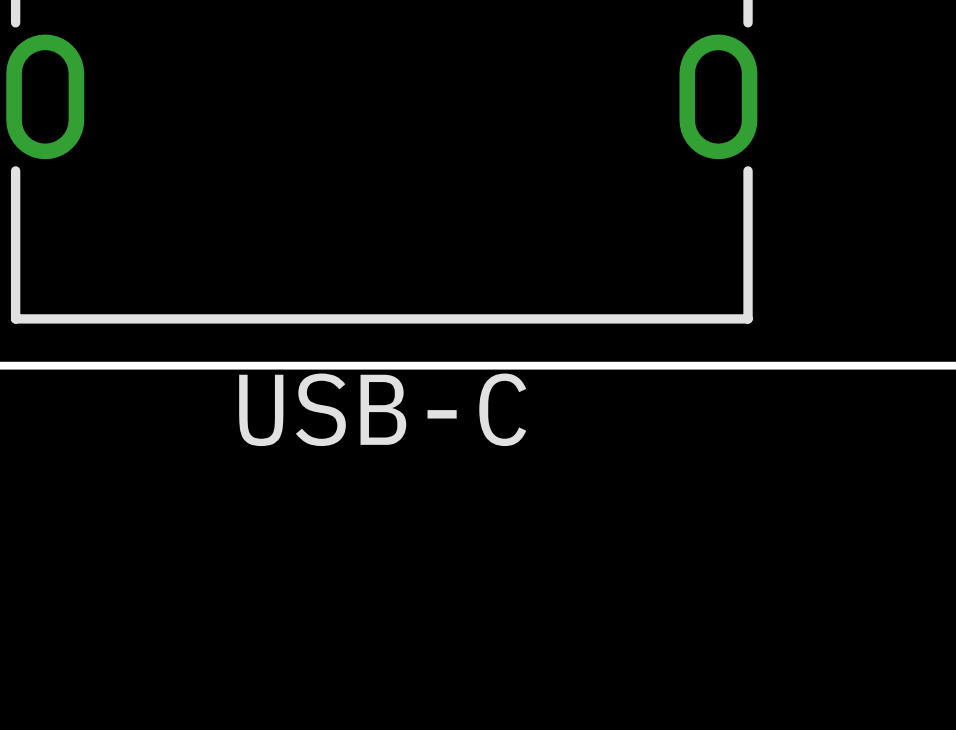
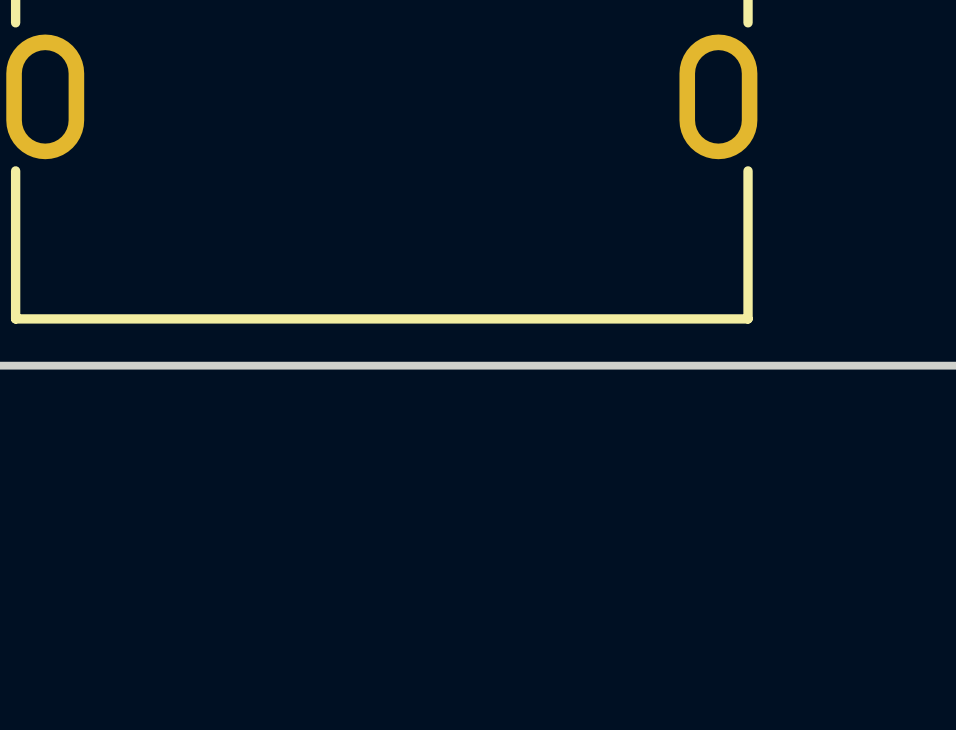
part value: USB-C (382, 409) -> none

